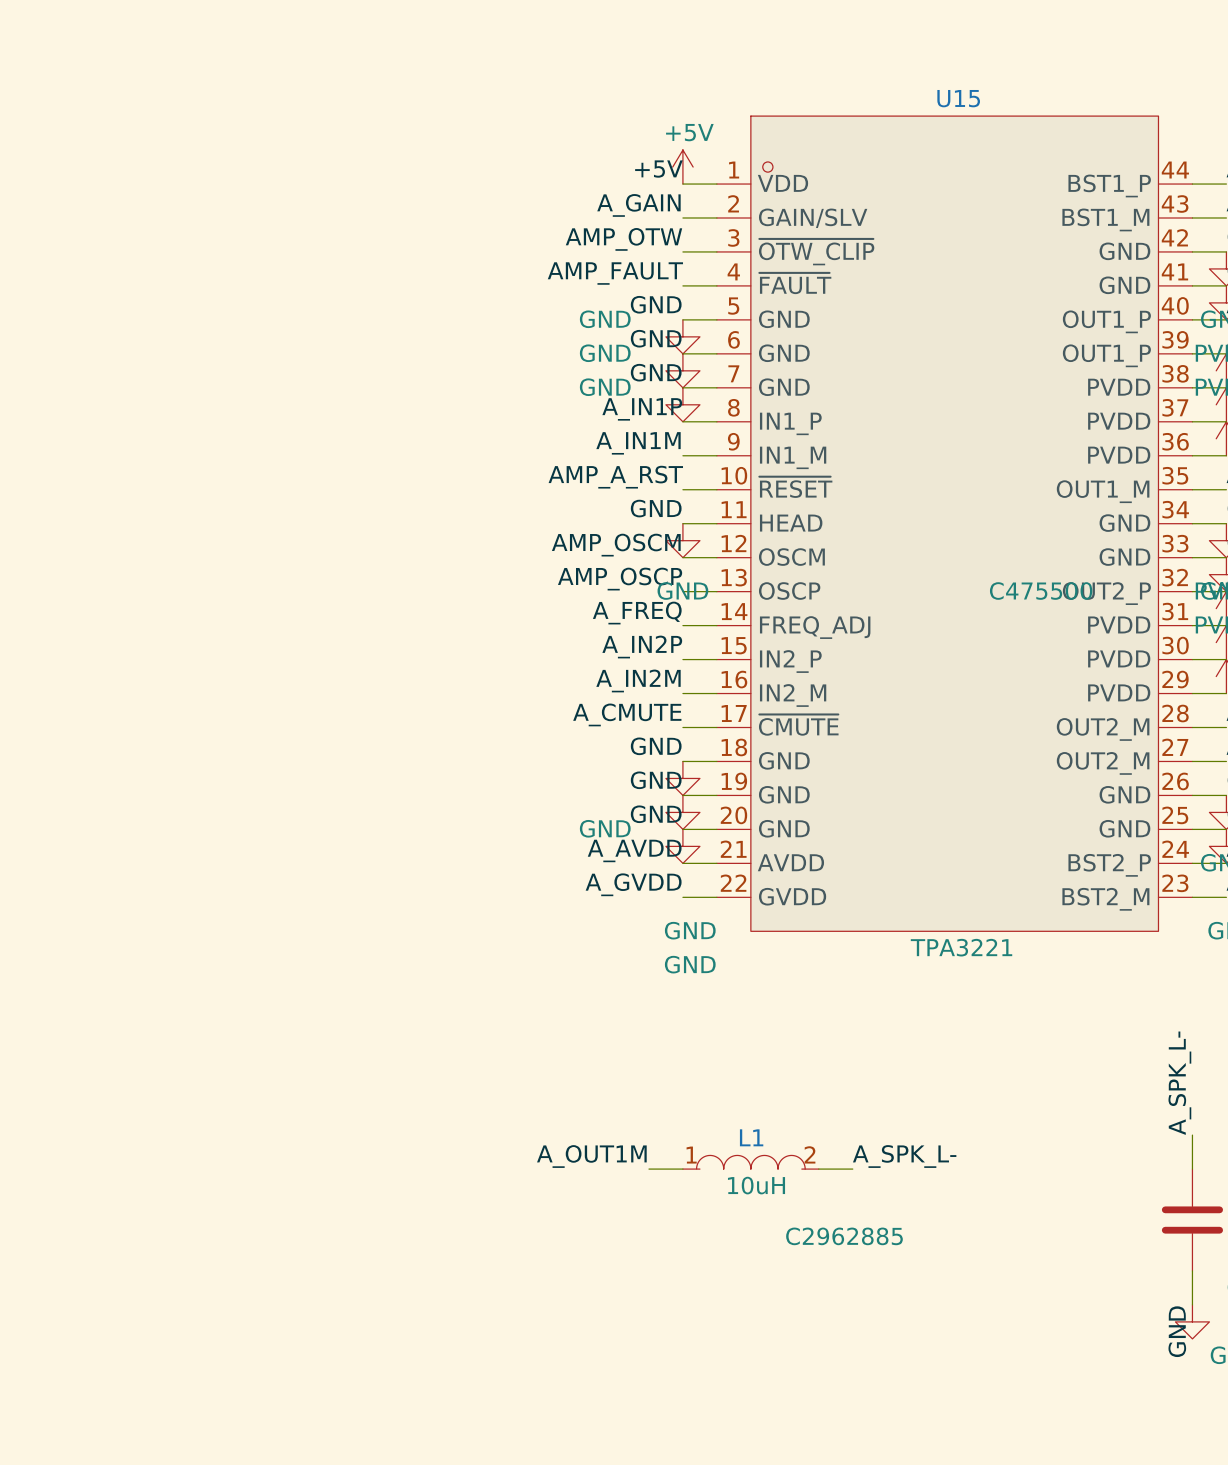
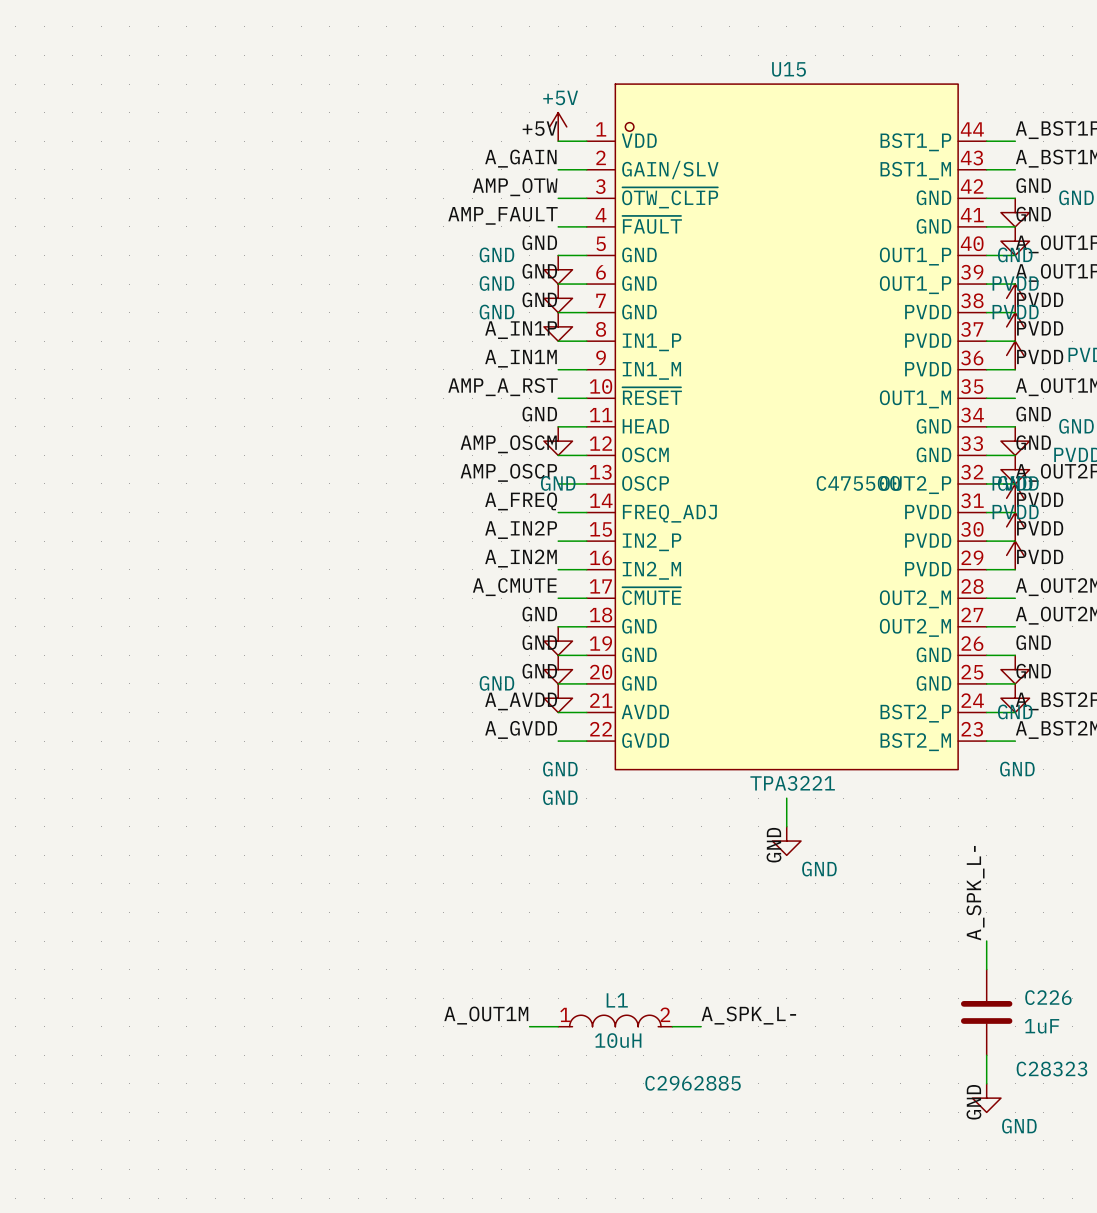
wire: none -> (786, 798) (786, 826)
power symbol: none -> GND (786, 841)
label: none -> GND (773, 845)
label position: A_OUT1M (591, 1156) -> A_OUT1M (486, 1015)
label position: A_SPK_L- (904, 1156) -> A_SPK_L- (748, 1015)
L1 position: (750, 1162) -> (615, 1021)
wire: (648, 1169) (682, 1169) -> (529, 1026) (558, 1026)
wire: (818, 1169) (852, 1169) -> (672, 1026) (701, 1026)

